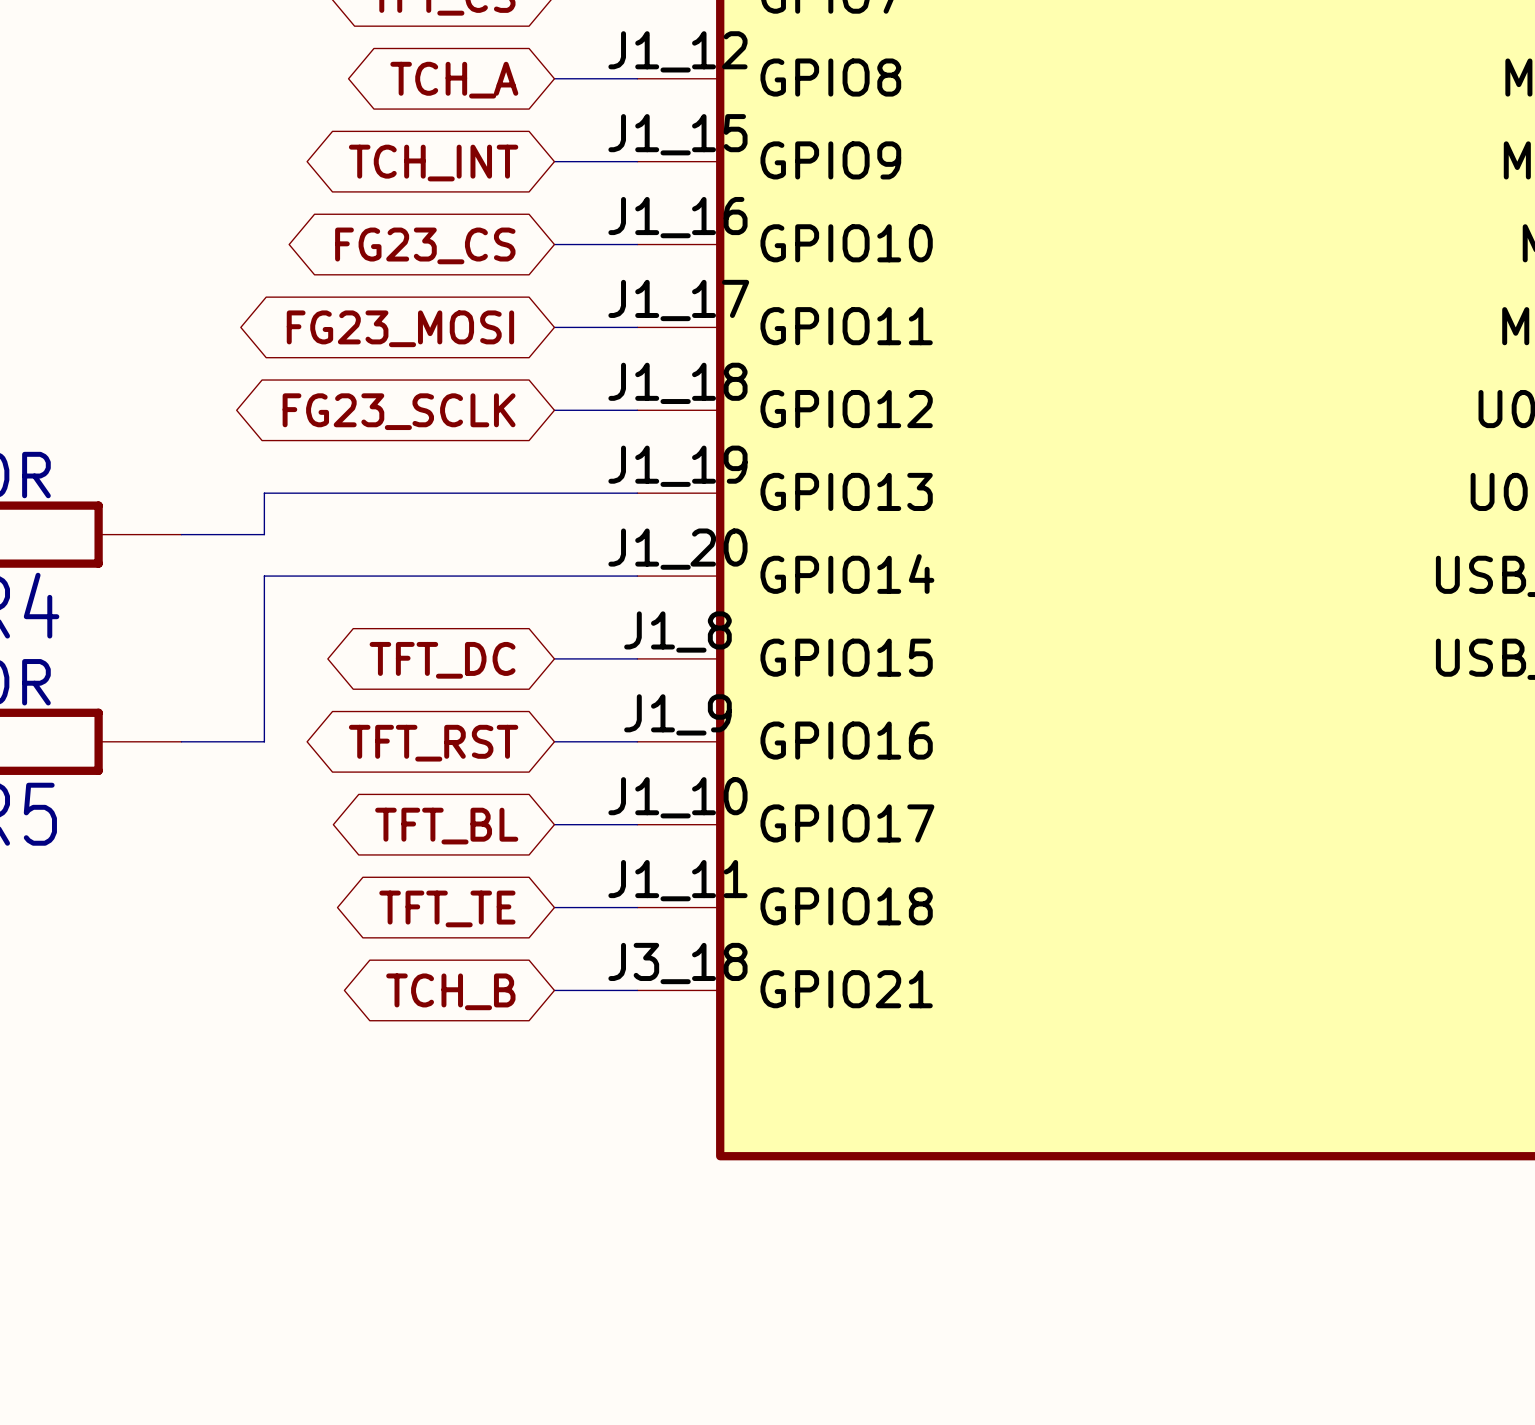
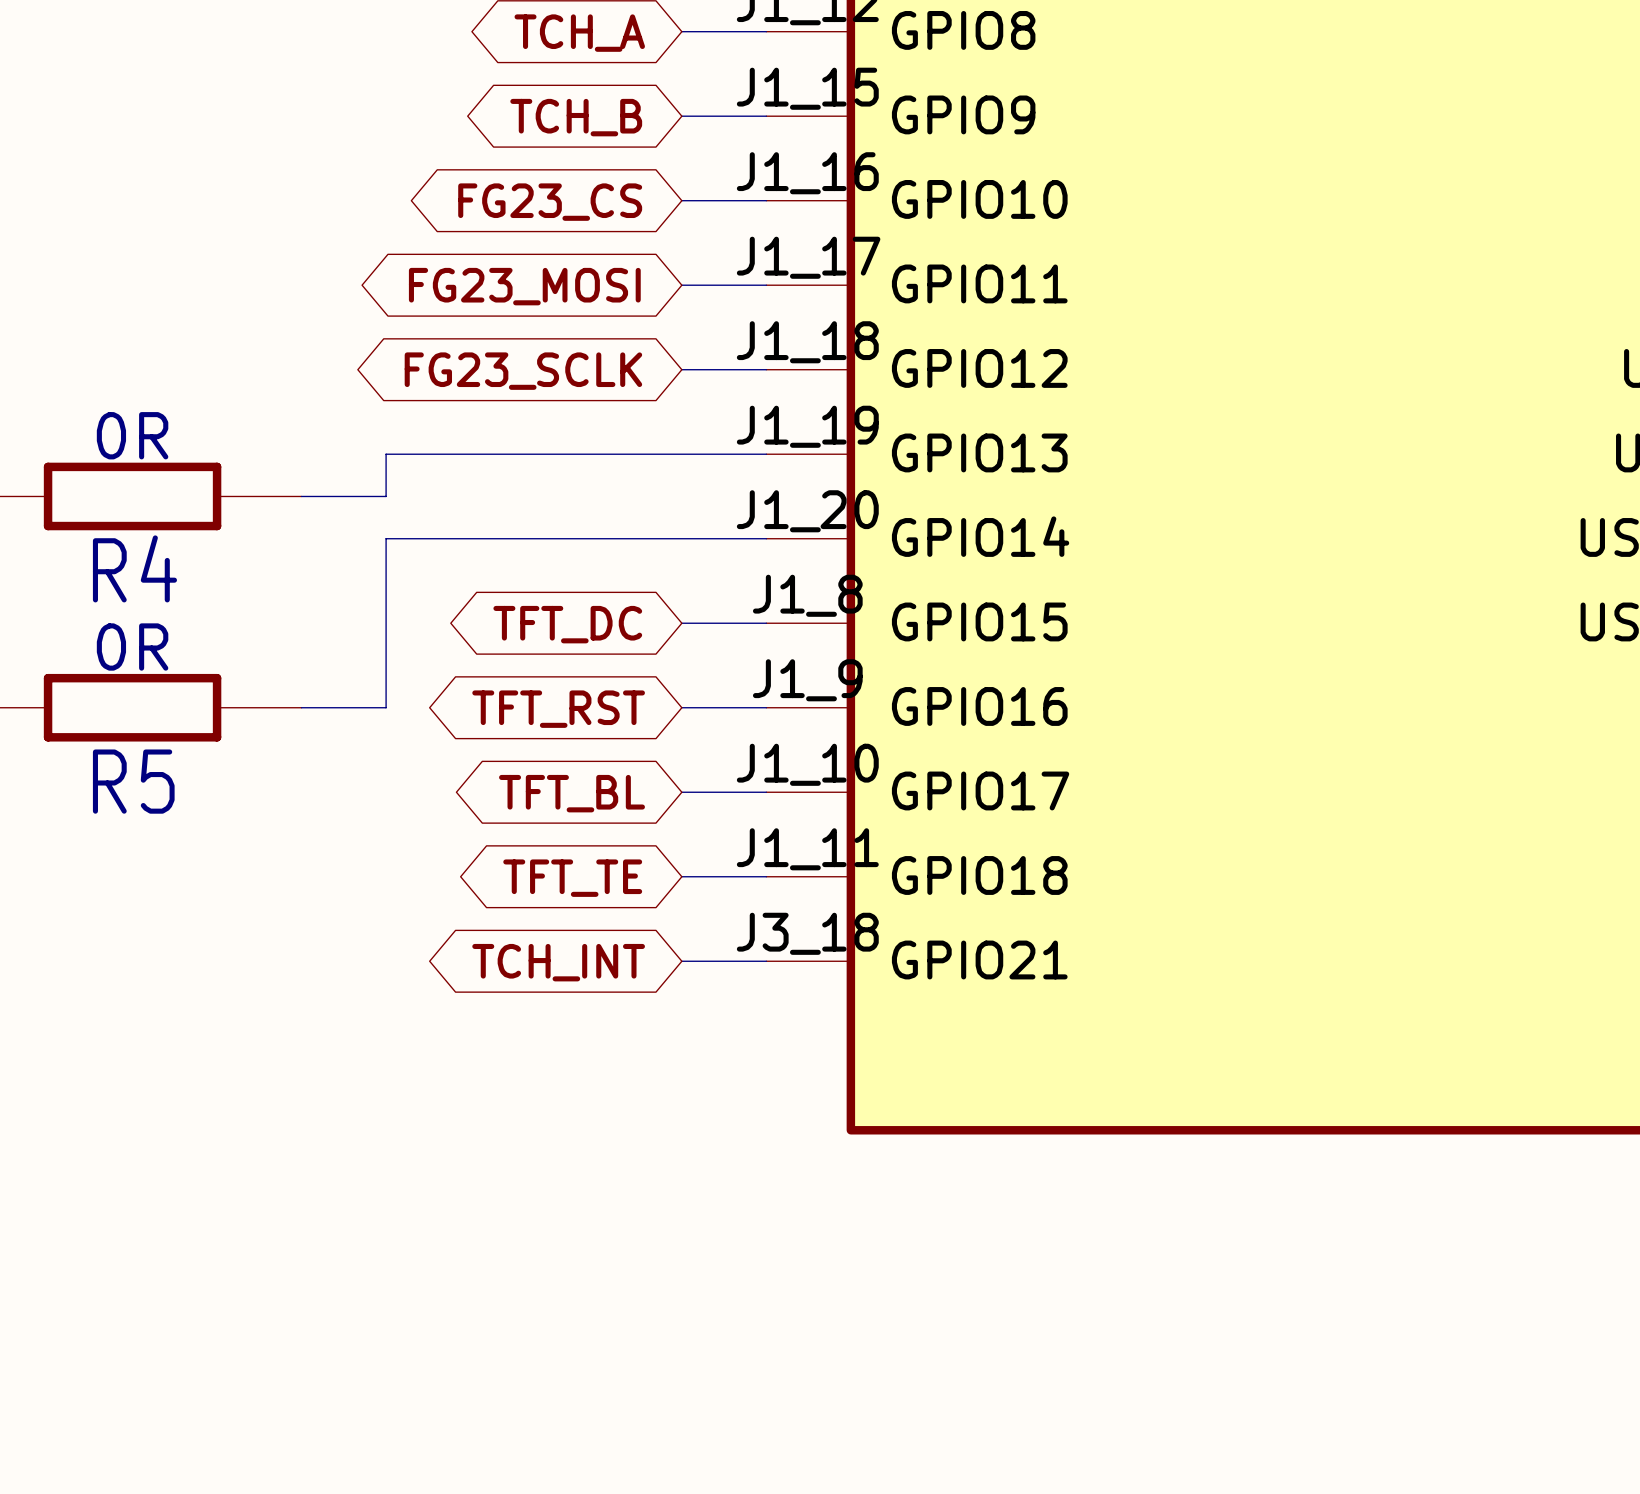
global label: TCH_INT (433, 163) -> TCH_B (576, 117)
global label: TCH_B (450, 991) -> TCH_INT (558, 962)

